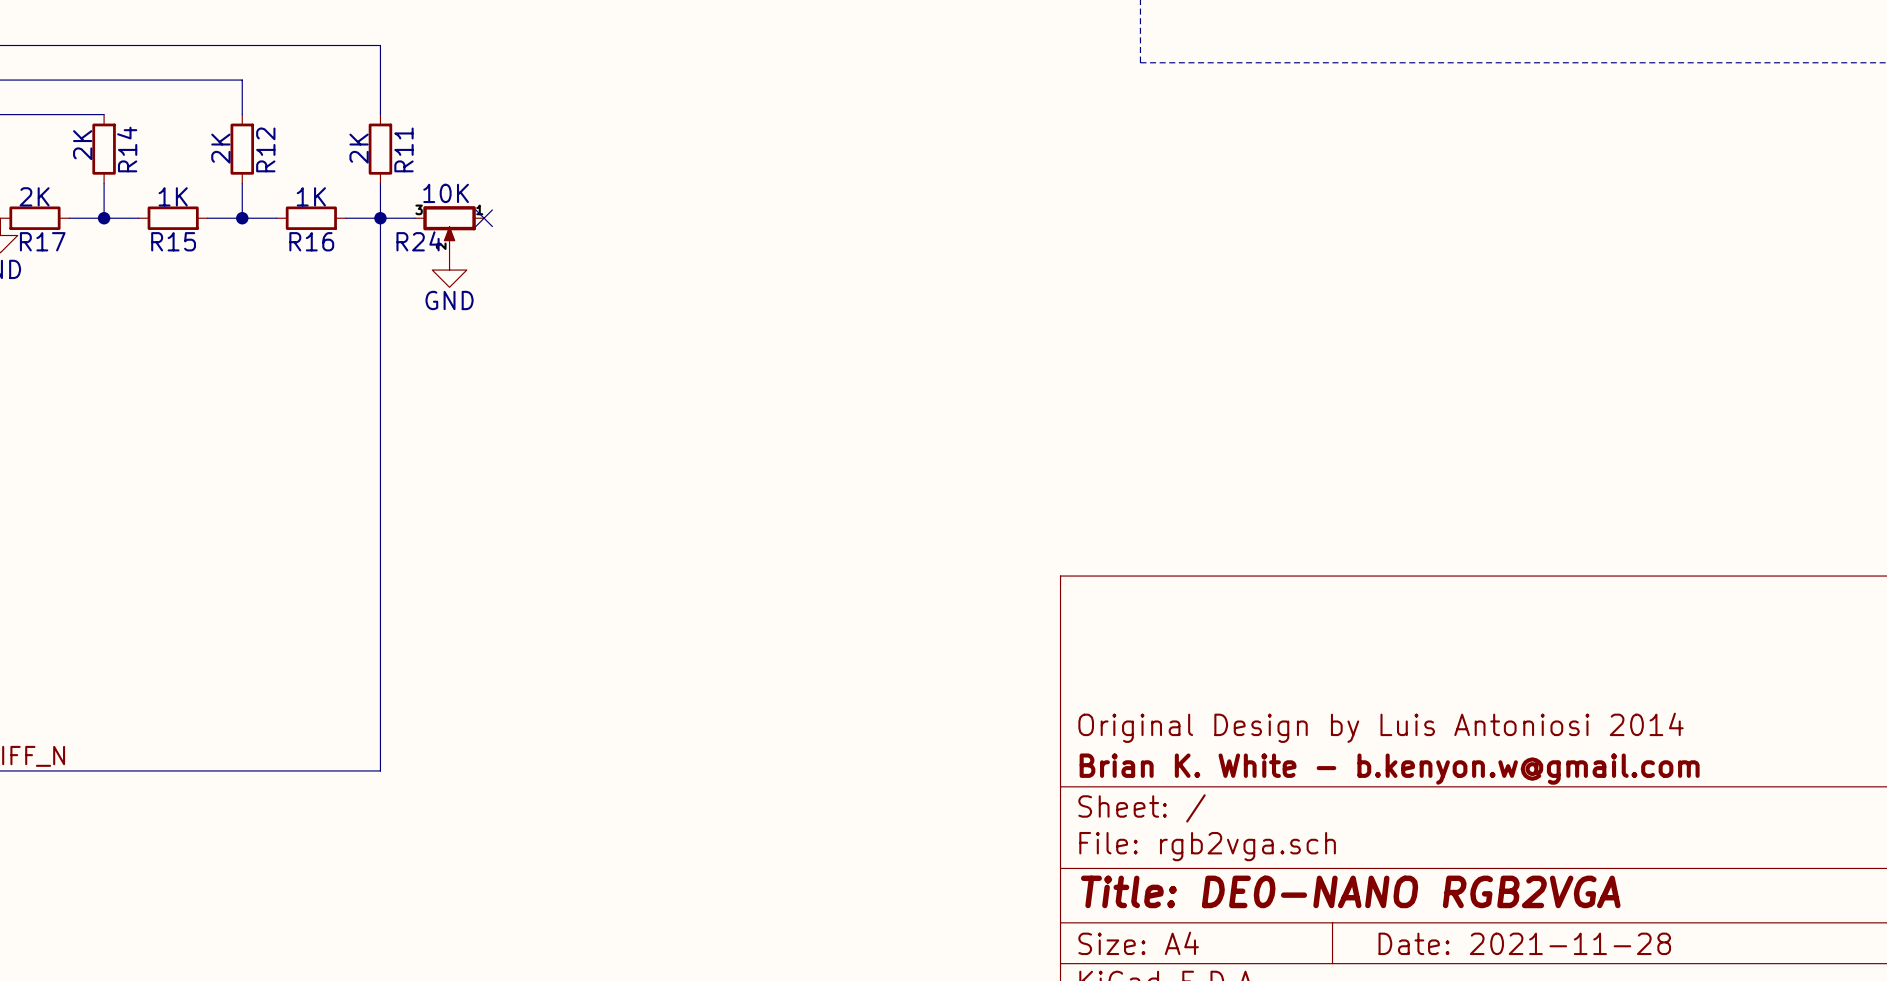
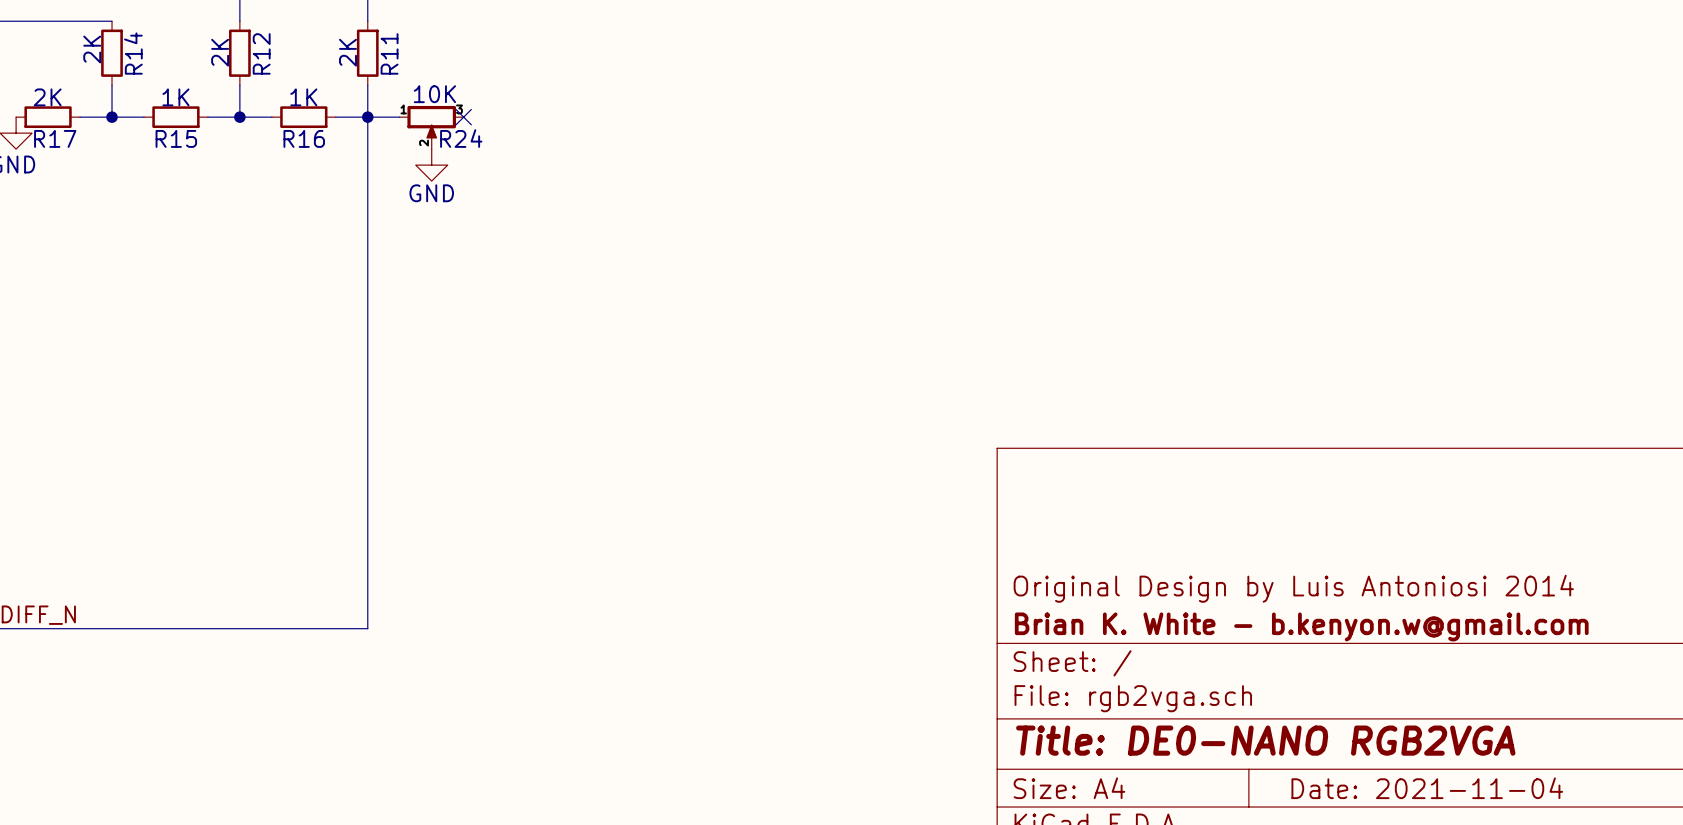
R24 flip: as is (449, 223) -> left-right (431, 121)
title block: Date: 2021-11-28 (1524, 943) -> Date: 2021-11-04 (1427, 788)

